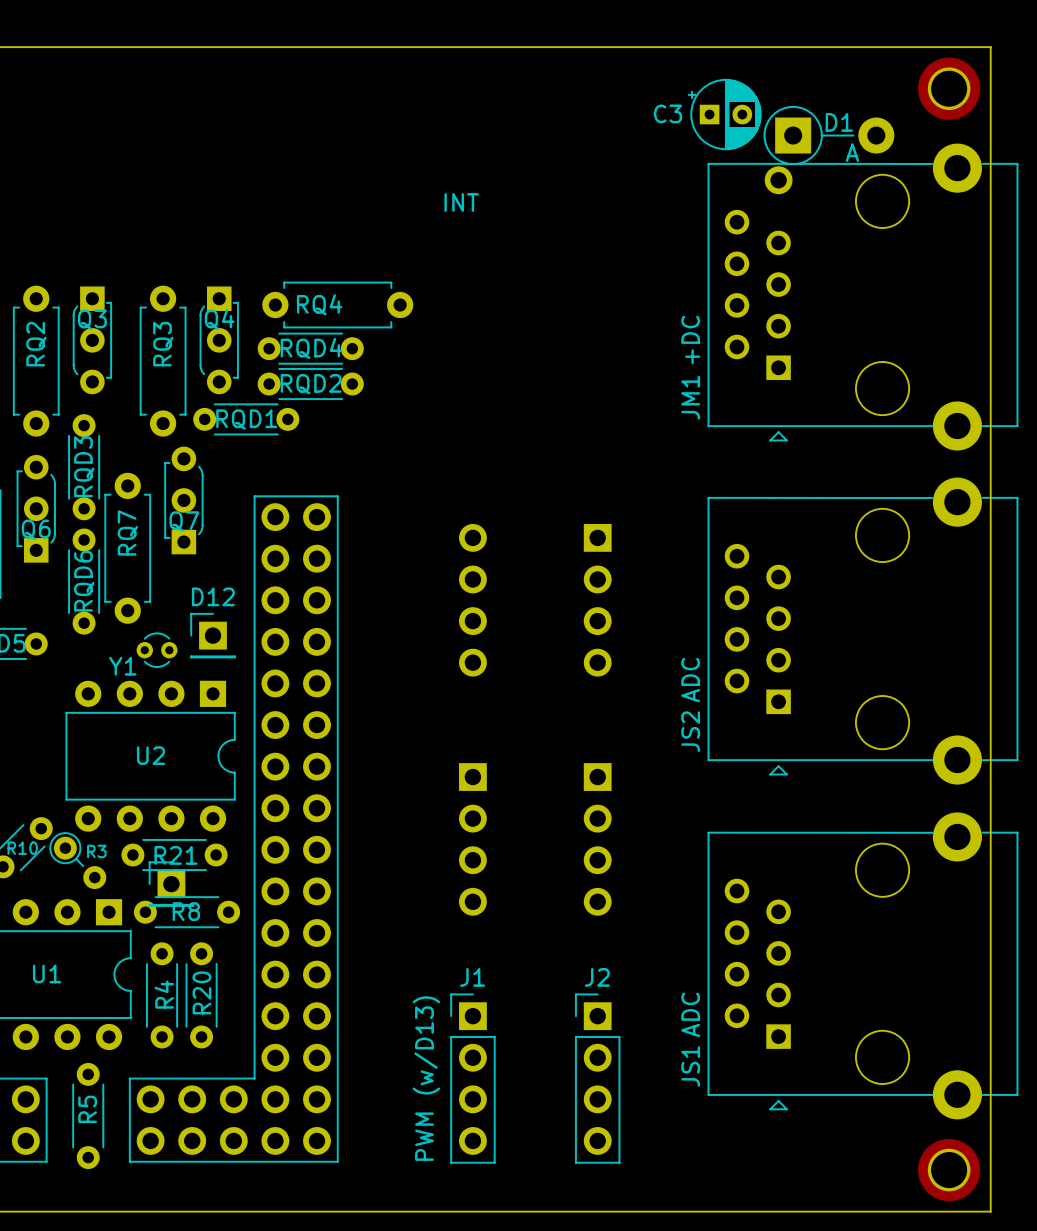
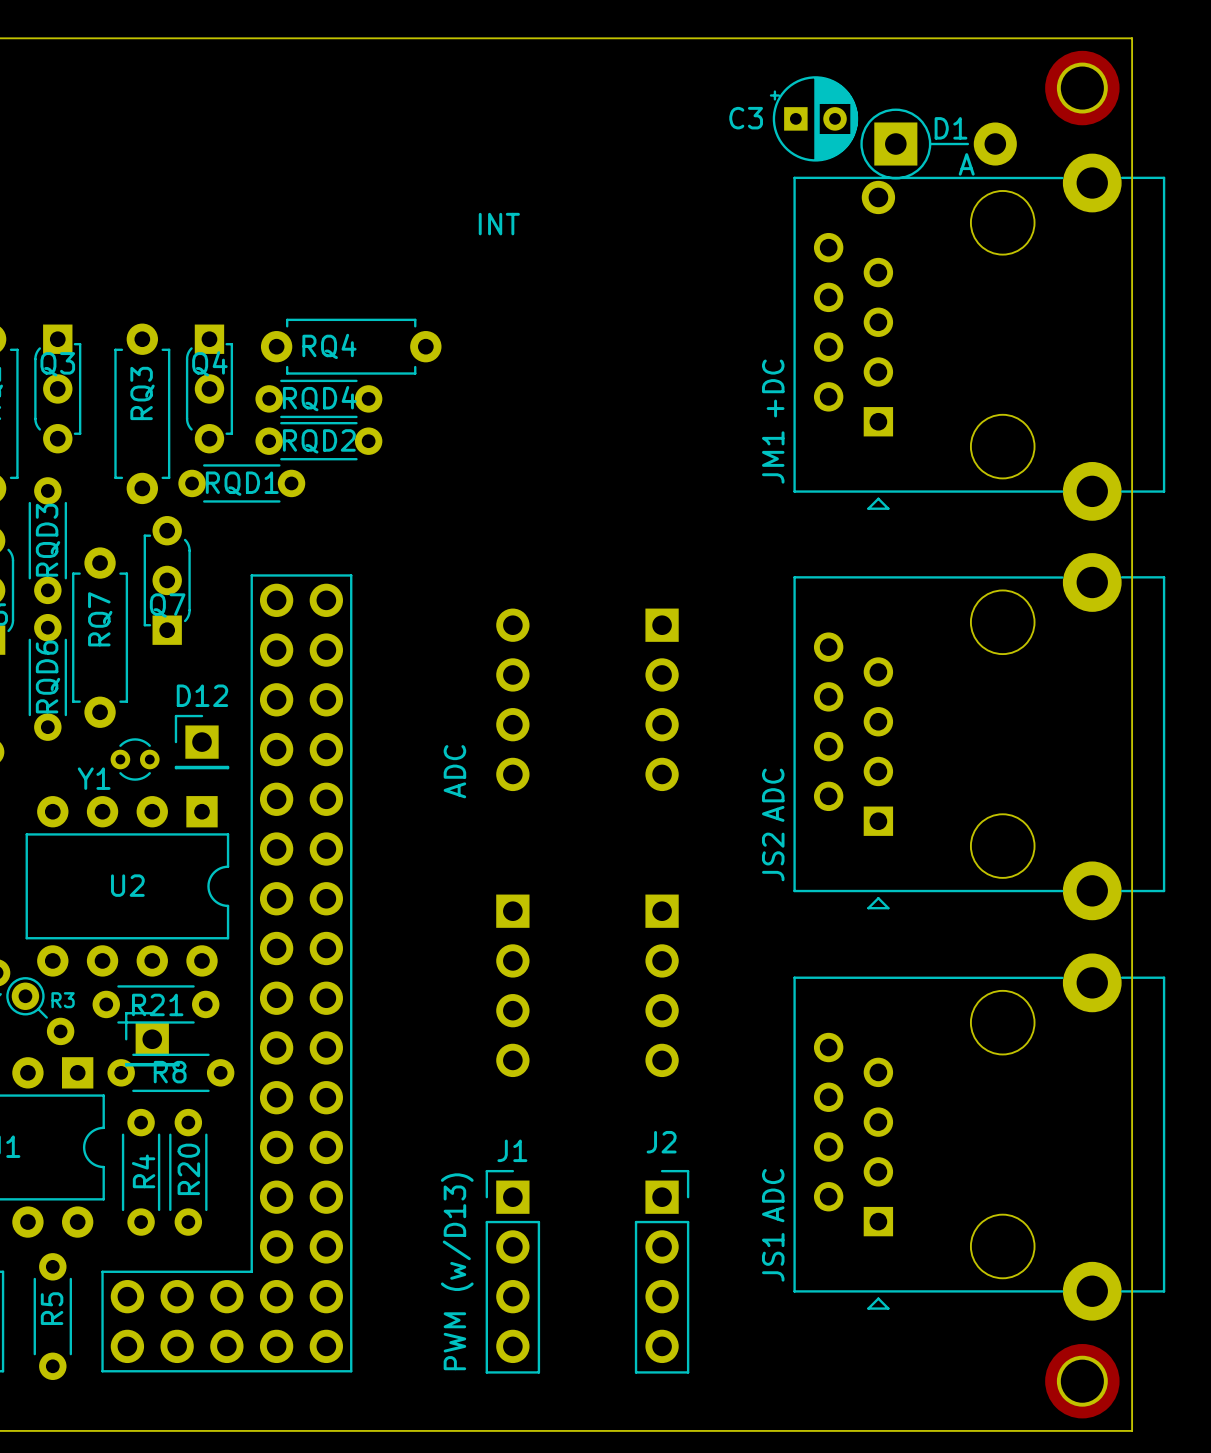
text: none -> ADC (454, 771)
J2 footprint: [574, 993, 621, 1164] -> [634, 1169, 690, 1374]

